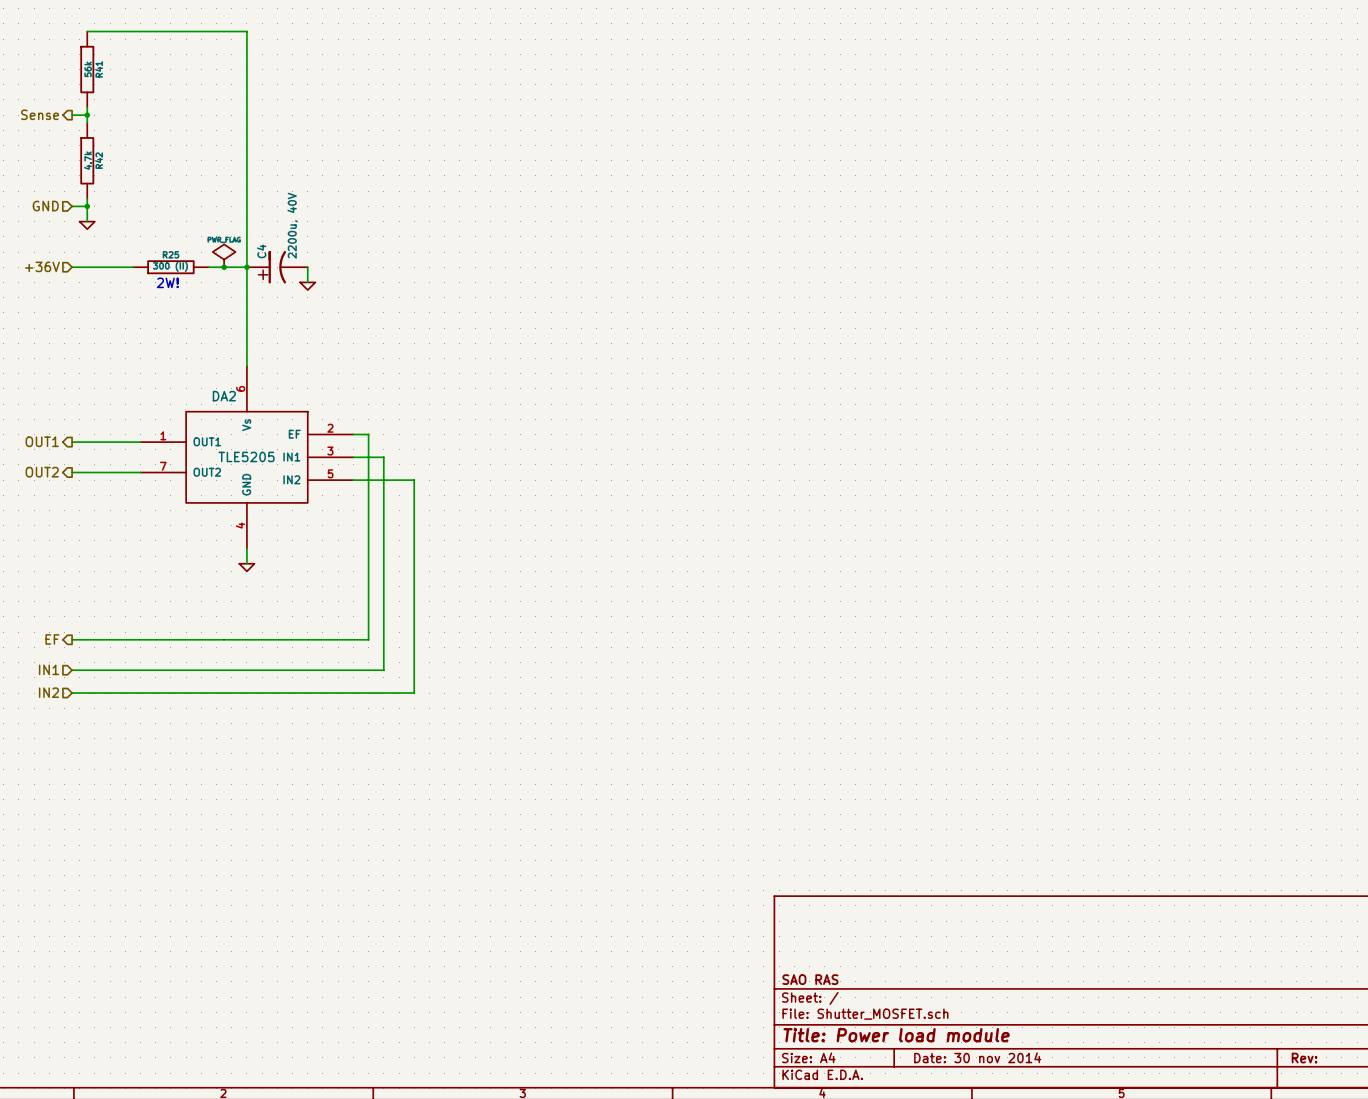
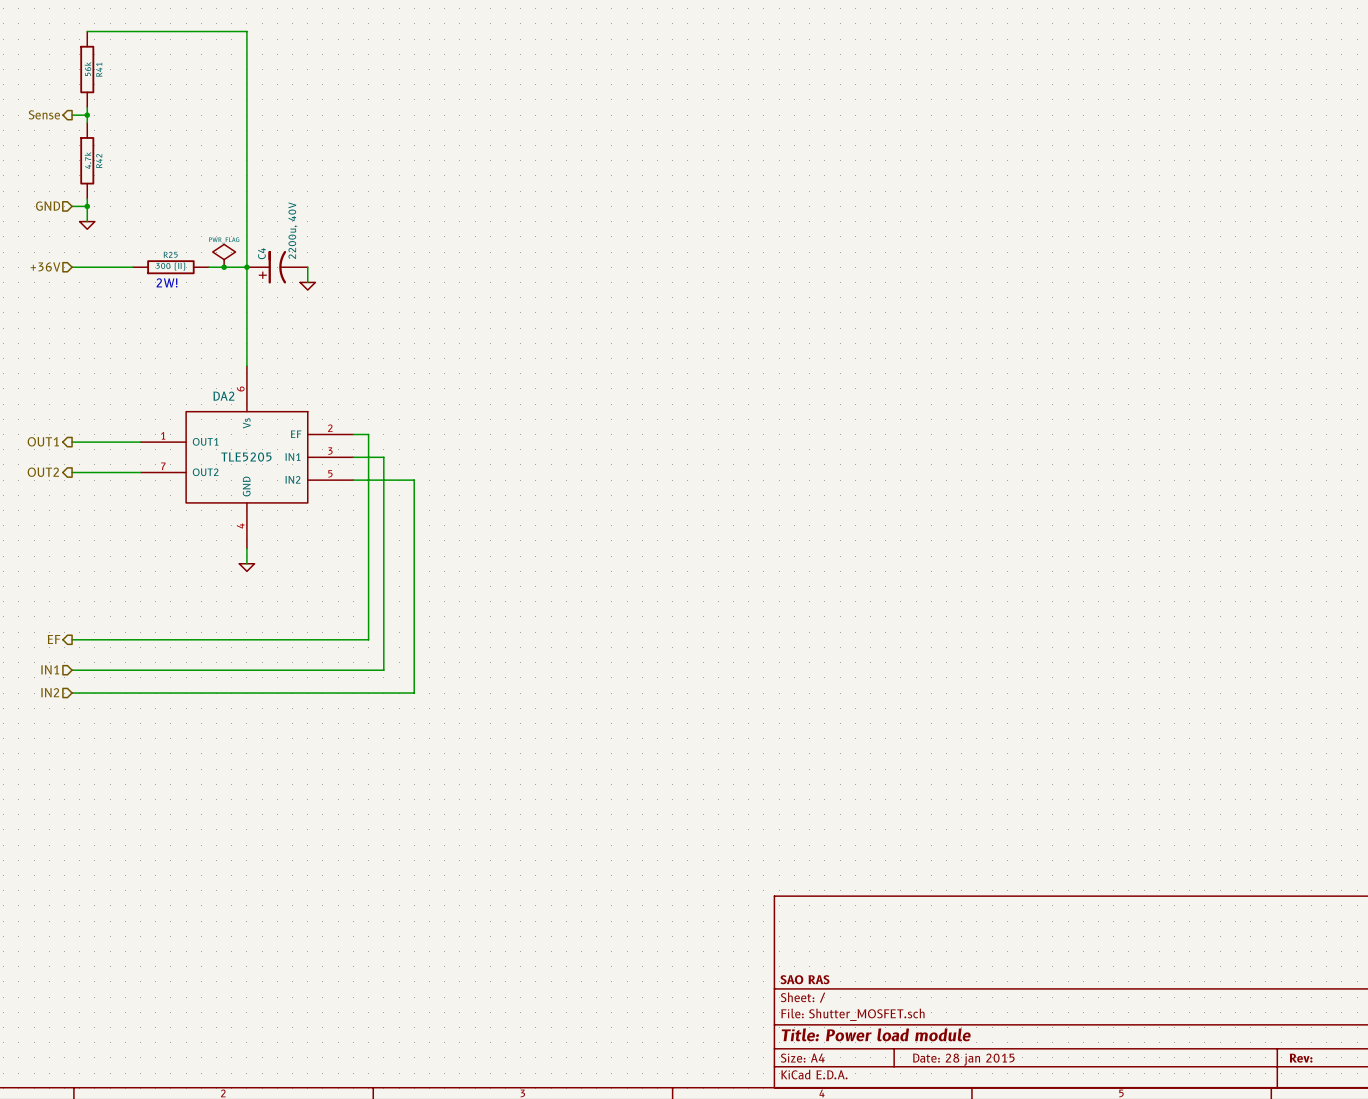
title block: Date: 30 nov 2014 (977, 1057) -> Date: 28 jan 2015 (963, 1059)

